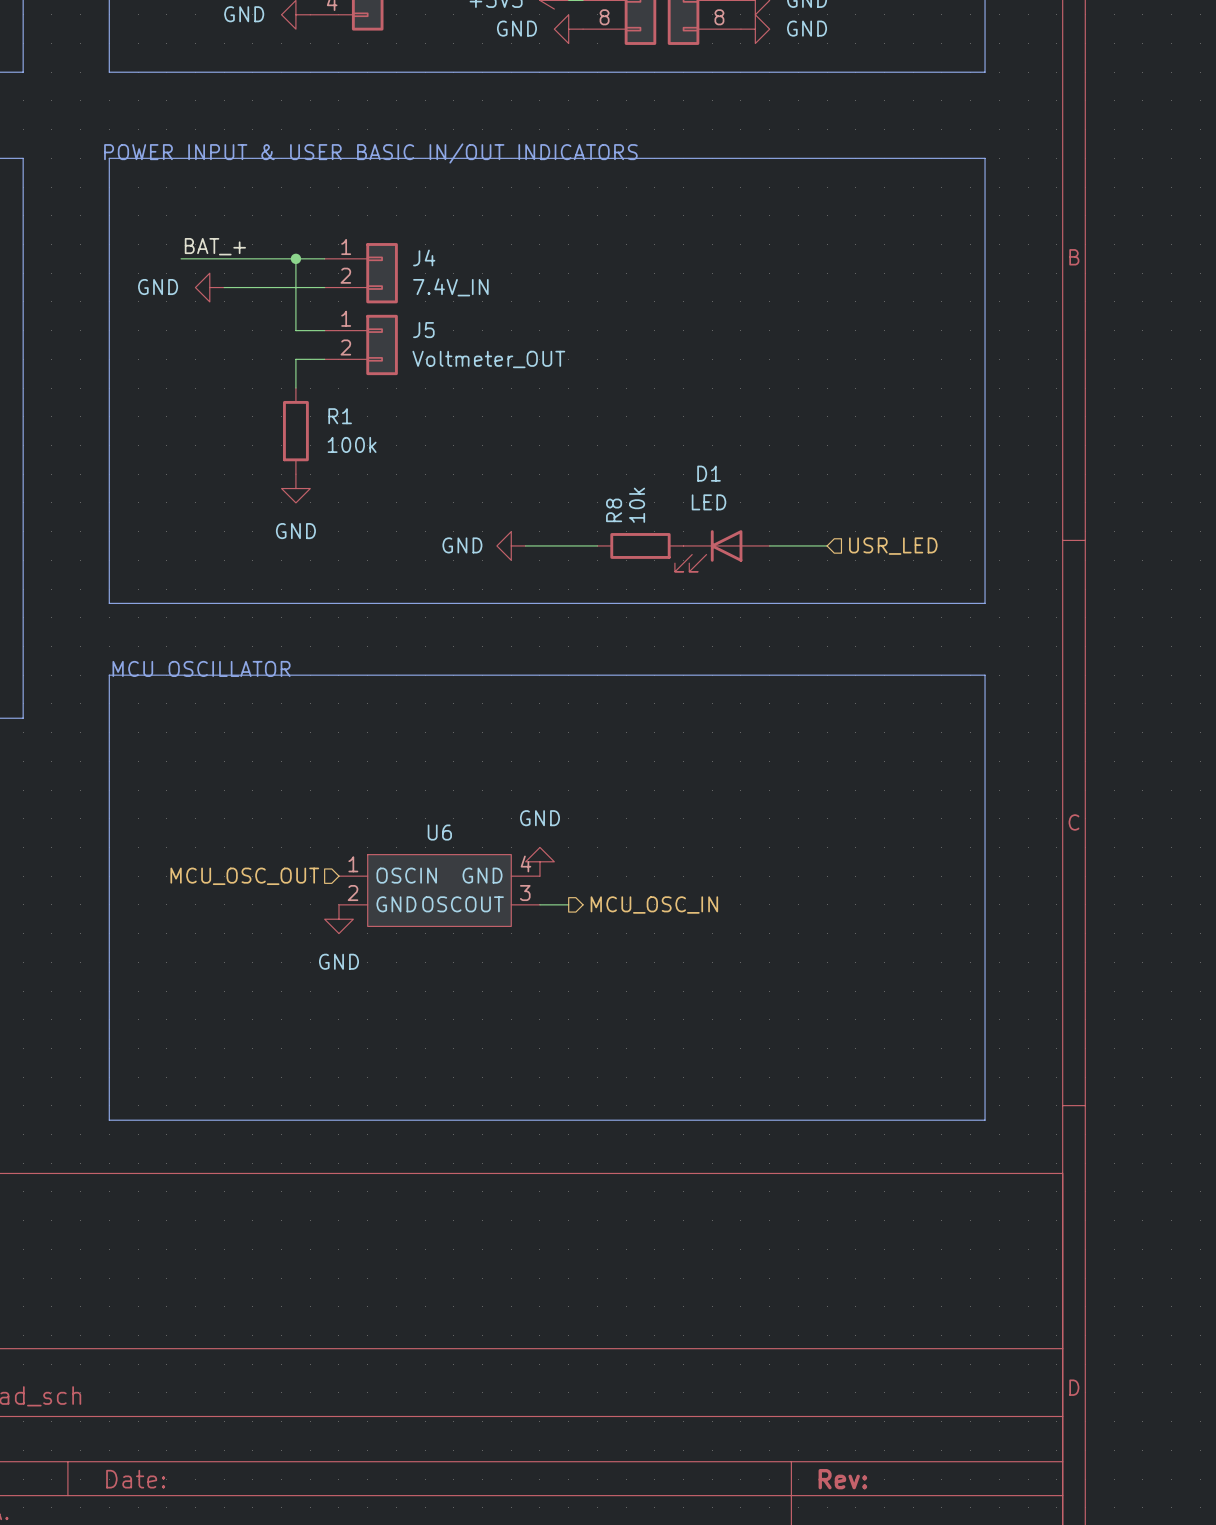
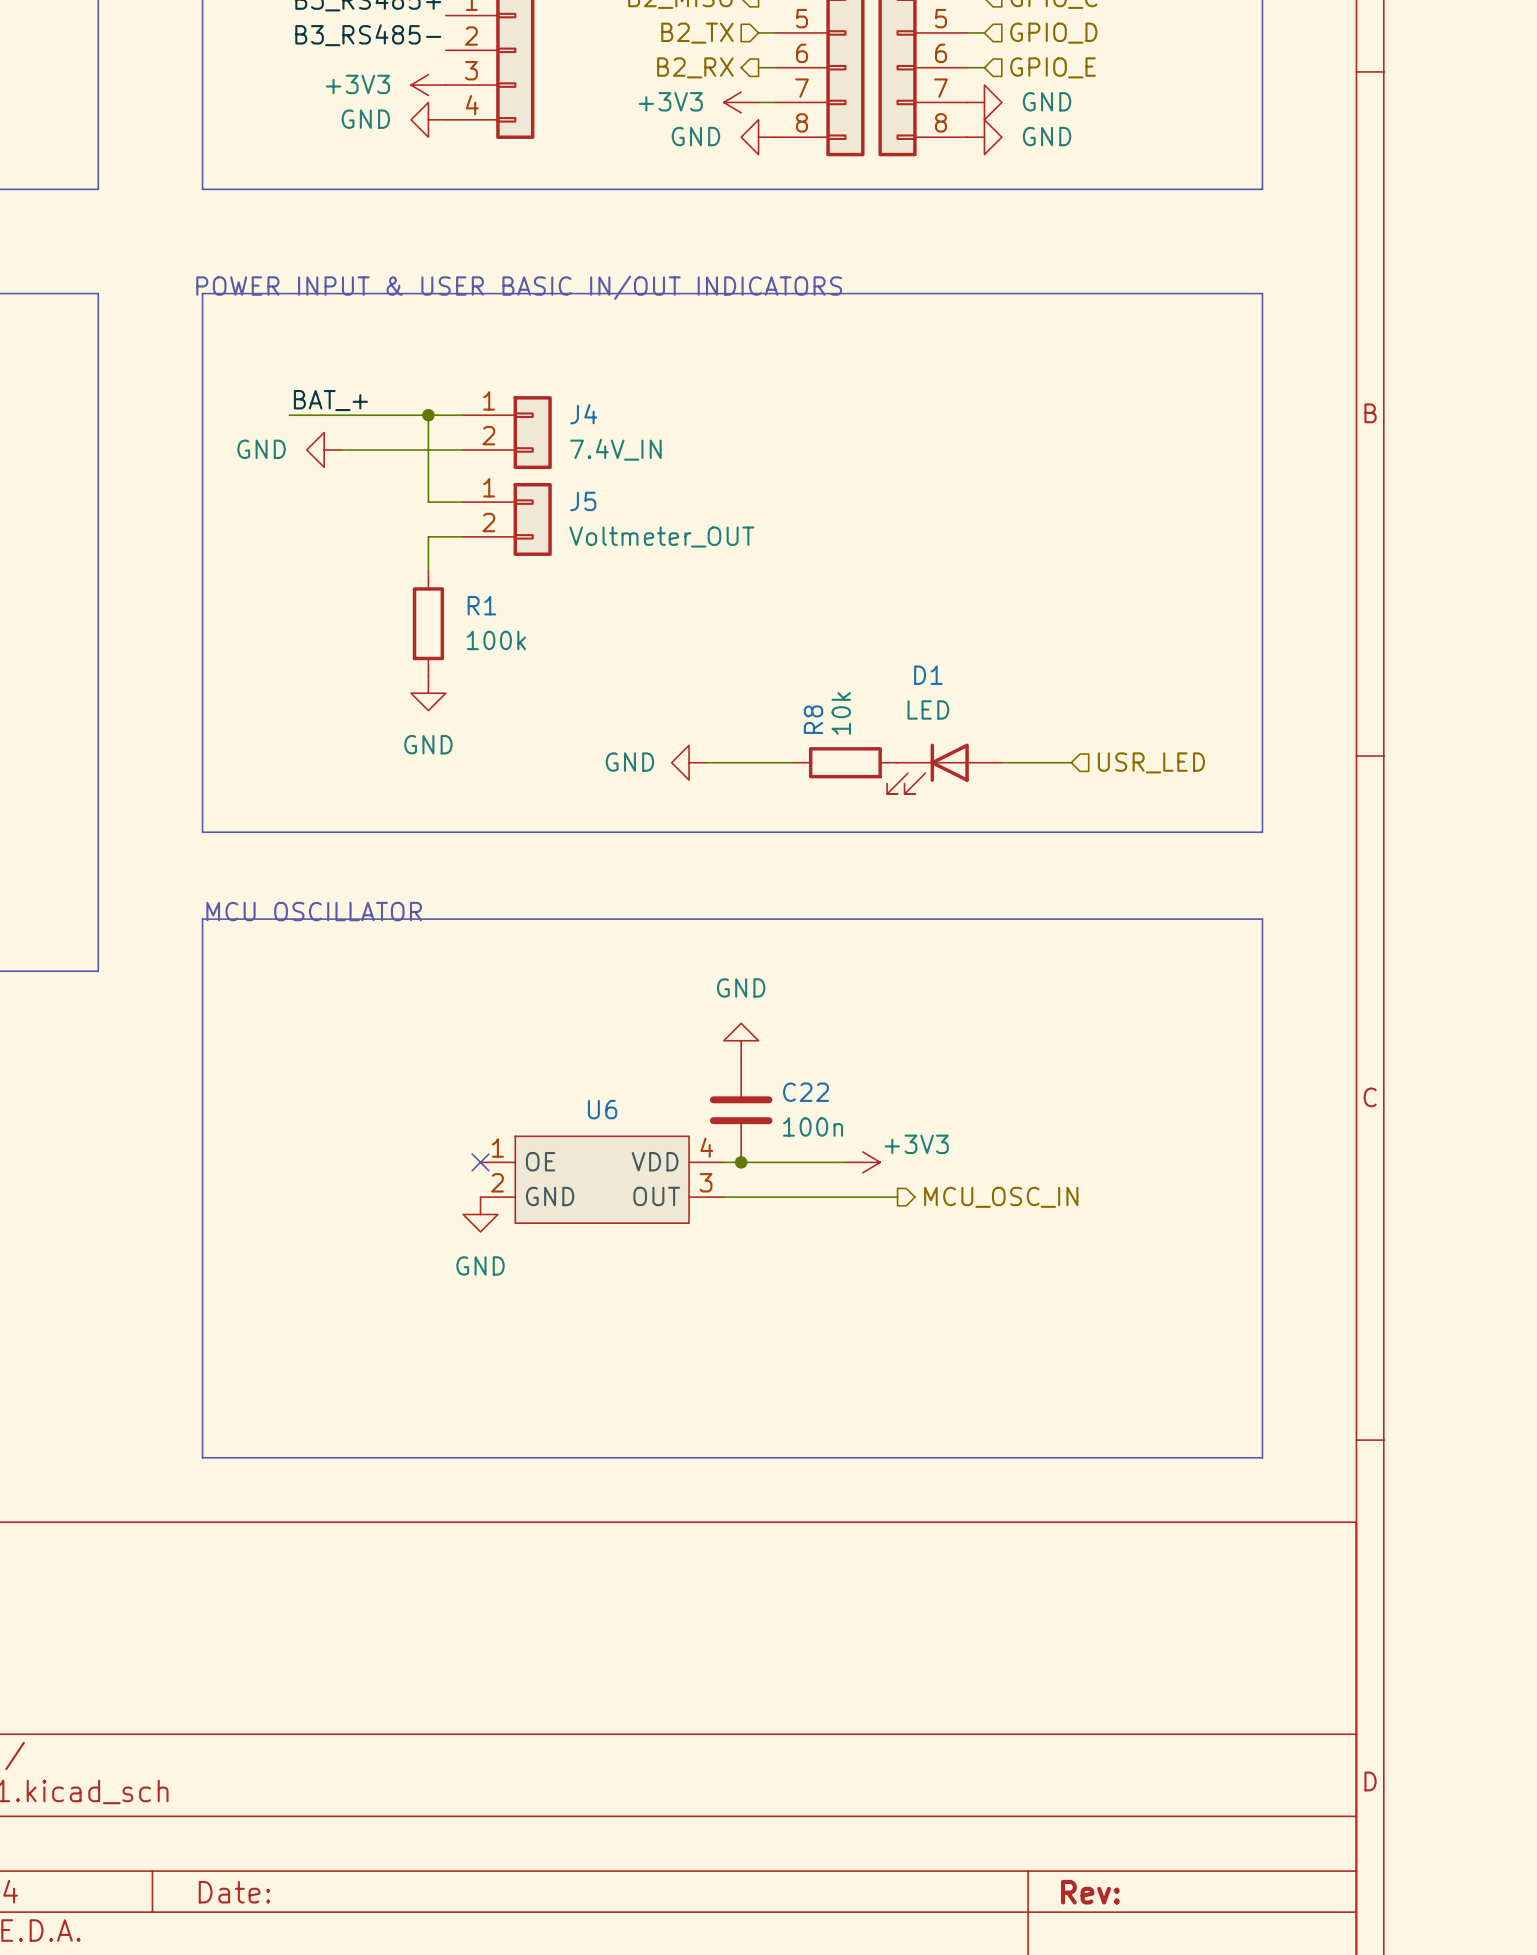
C22: none -> 100n (741, 1110)
power symbol position: GND (539, 861) -> GND (741, 1040)
U6 pin name: OSCIN (406, 875) -> OE (540, 1161)
U6 pin name: GND (482, 875) -> VDD (655, 1161)
hierarchical label: MCU_OSC_OUT (244, 876) -> none
no-connect mark: none -> (480, 1162)
wire: none -> (723, 1162) (845, 1162)
junction: none -> (741, 1162)
power symbol: none -> +3V3 (862, 1162)
U6 pin name: OSCOUT (463, 904) -> OUT (656, 1196)
wire: none -> (758, 1197) (897, 1197)
hierarchical label position: MCU_OSC_IN (654, 905) -> MCU_OSC_IN (1001, 1197)

